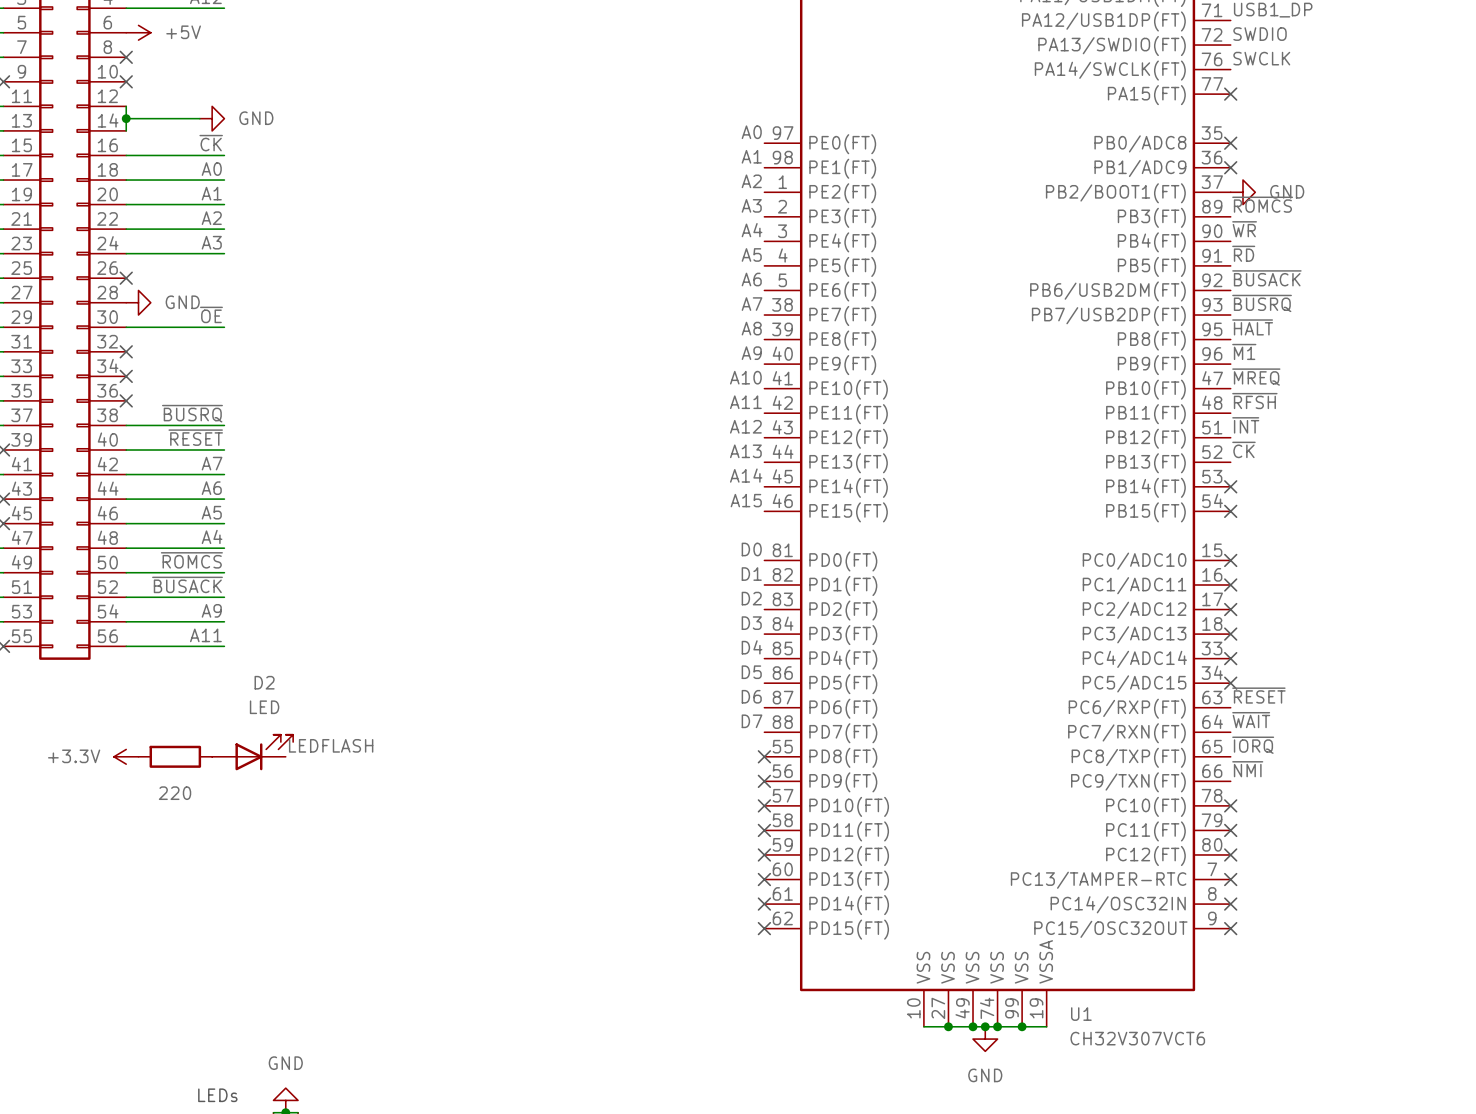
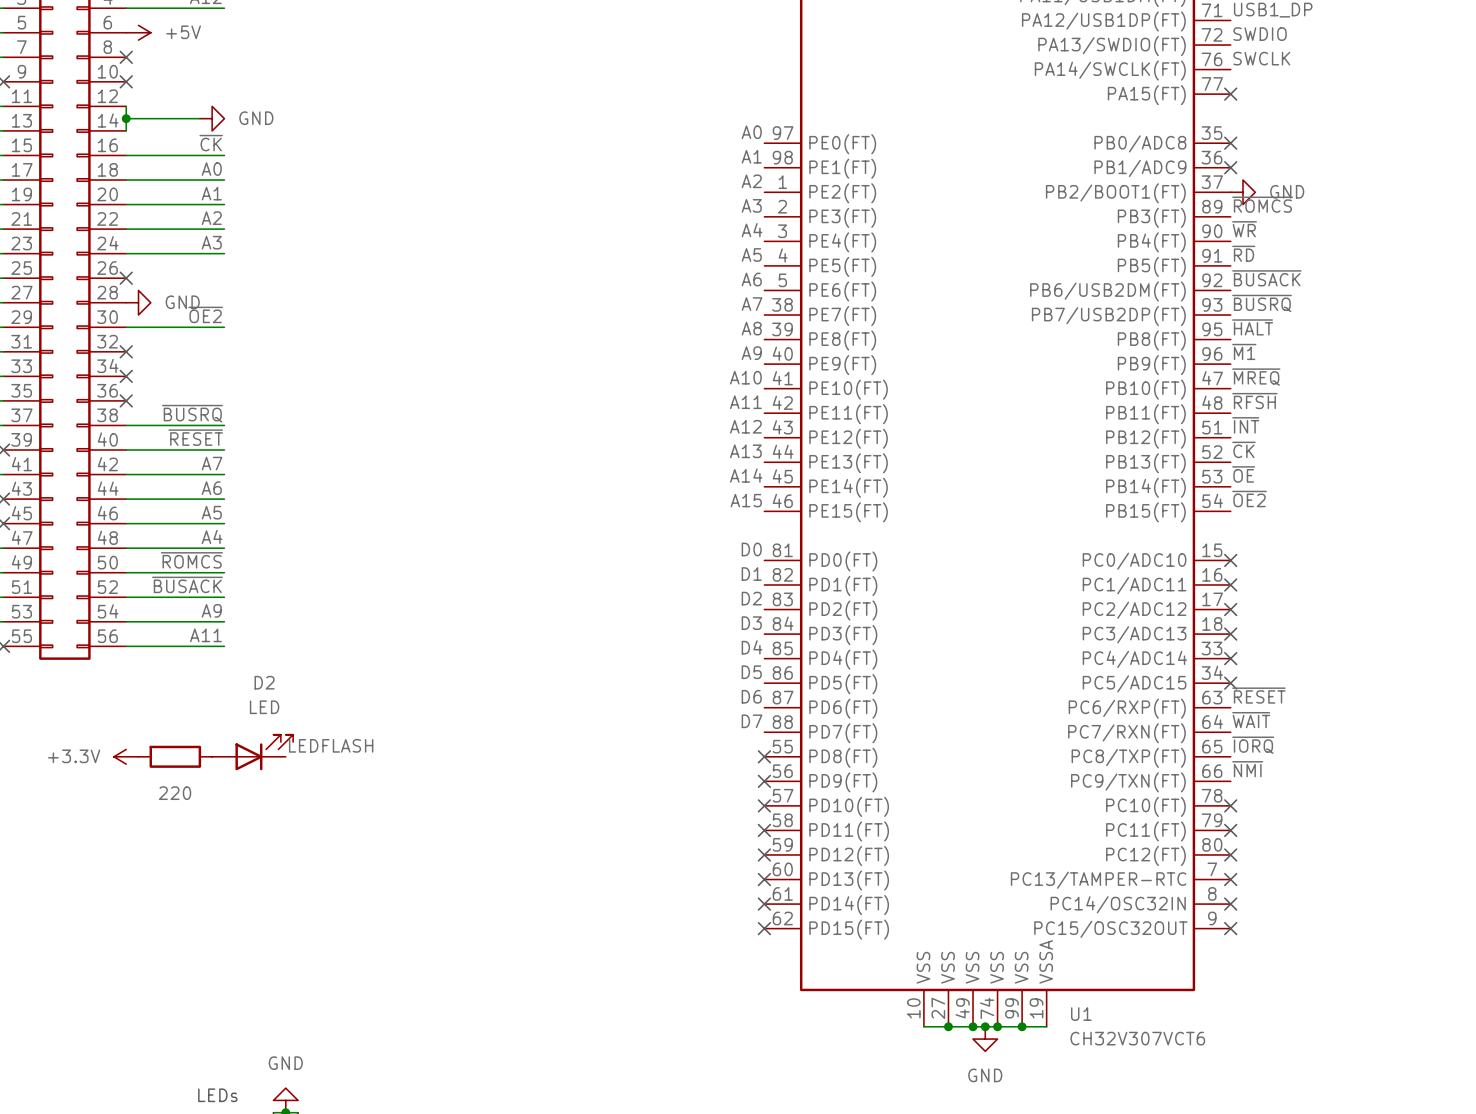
label: ~{OE} (211, 314) -> ~{OE2} (205, 314)
label: none -> ~{OE} (1243, 474)
no-connect mark: (1230, 486) -> none
label: none -> ~{OE2} (1249, 499)
no-connect mark: (1230, 511) -> none

